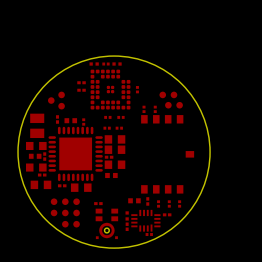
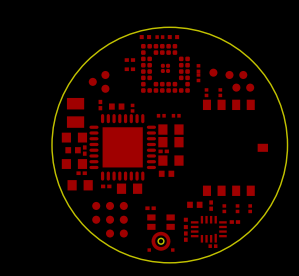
part: none -> (213, 72)
part: none -> (198, 77)
part: (107, 117) -> none
part: (120, 117) -> none

